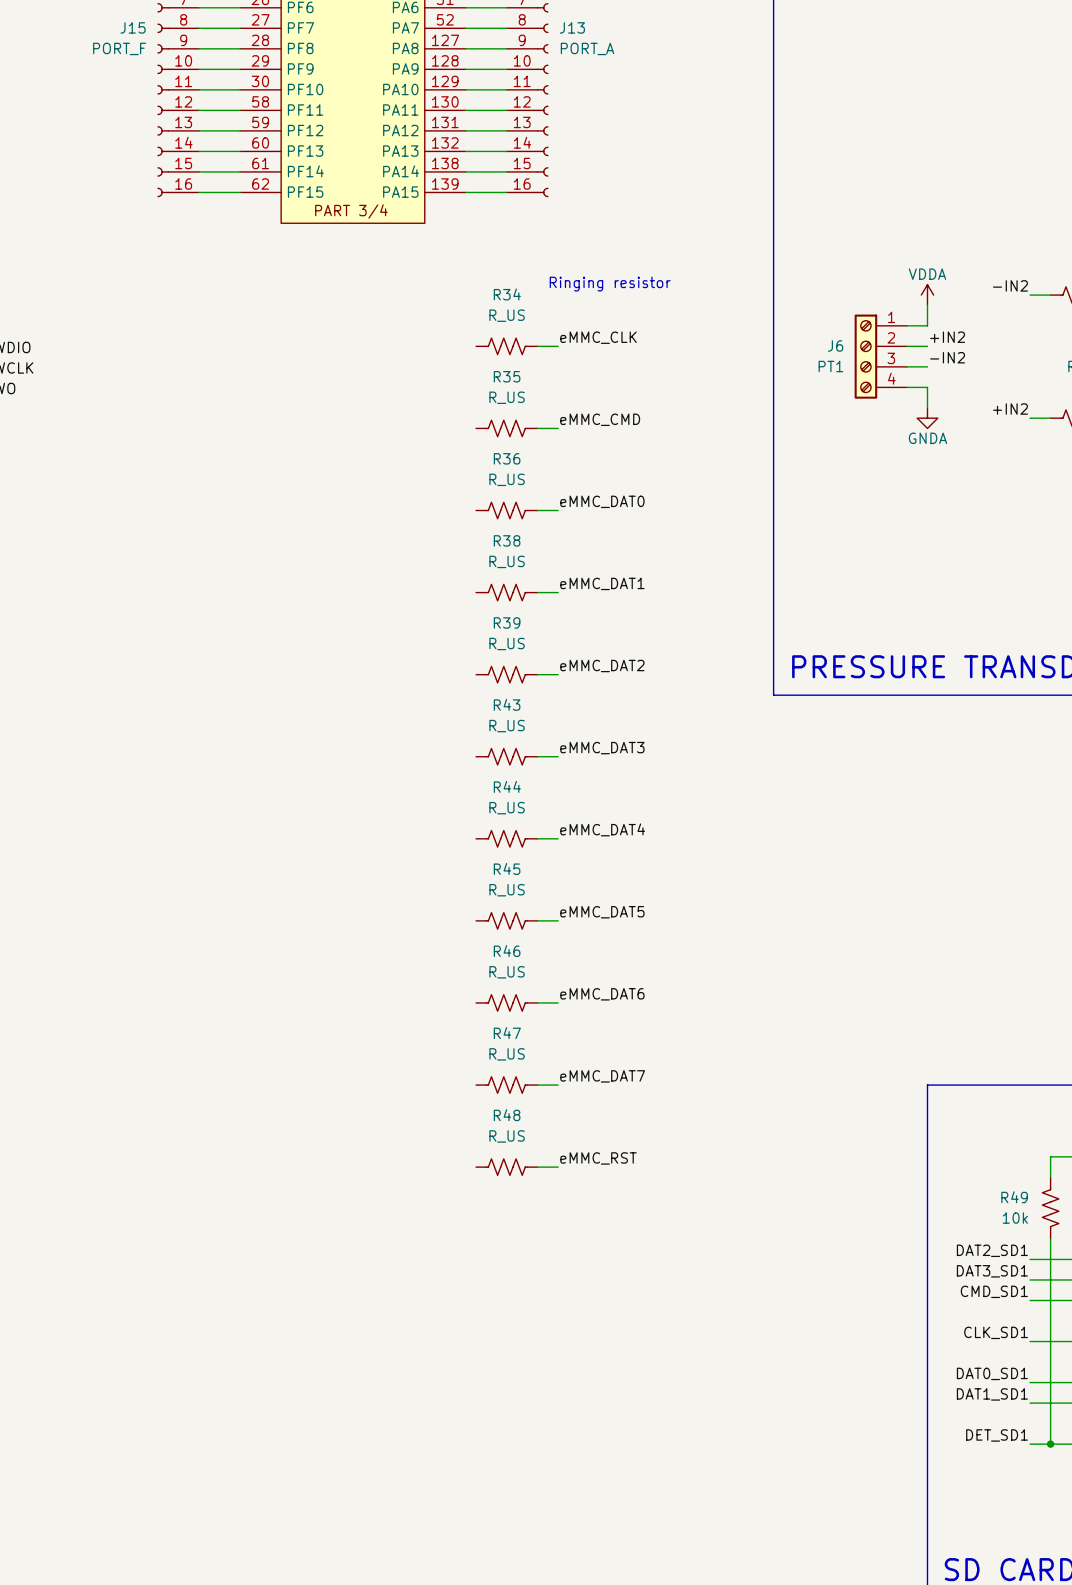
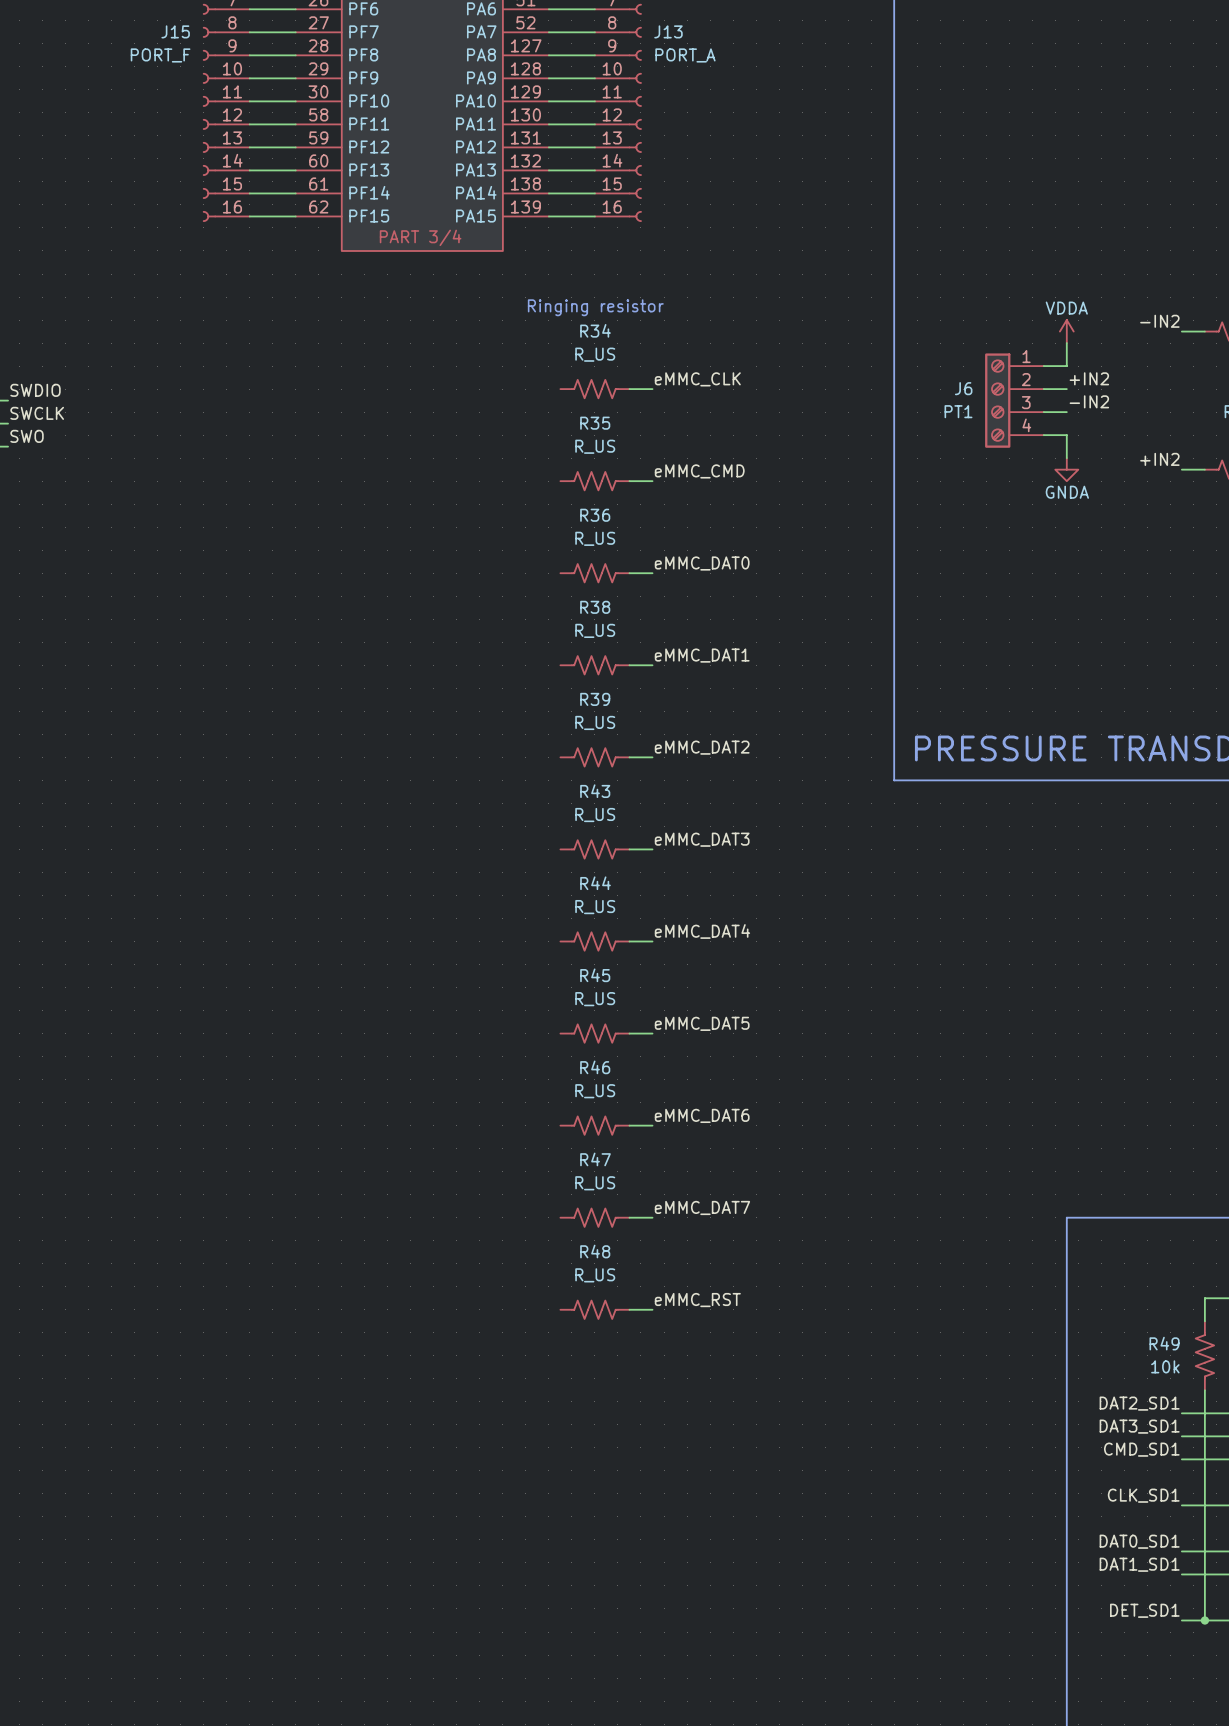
text position: Ringing resistor (610, 284) -> Ringing resistor (595, 307)

